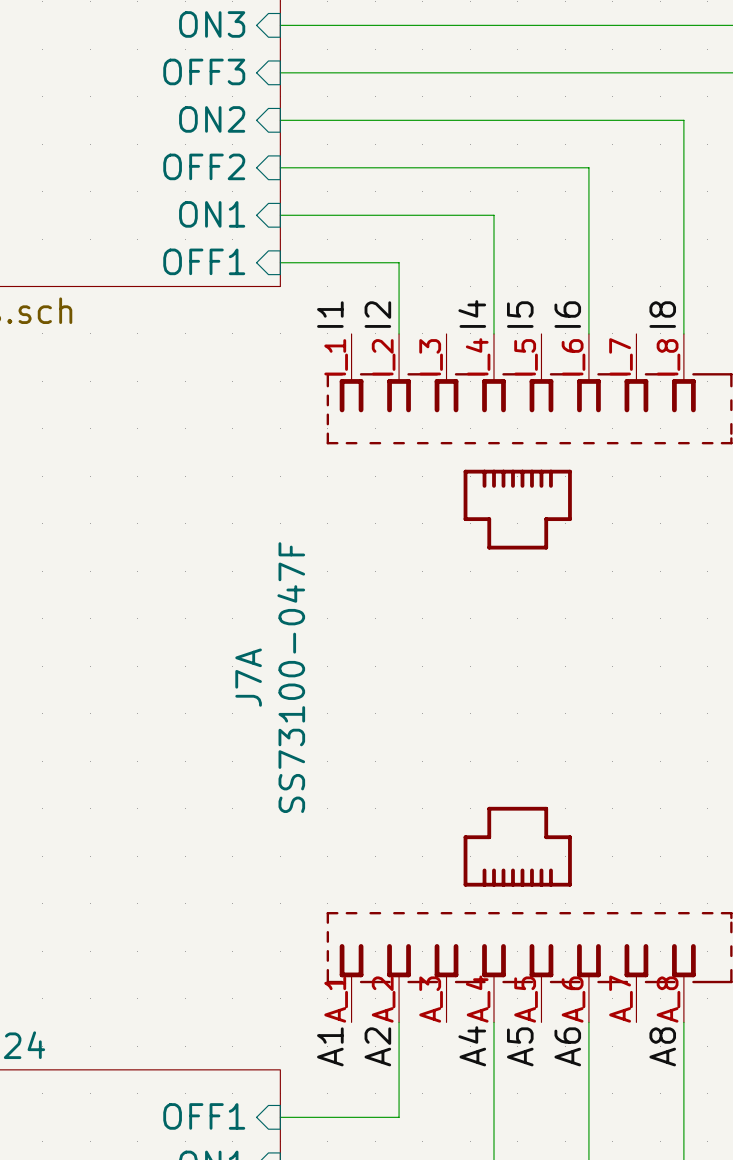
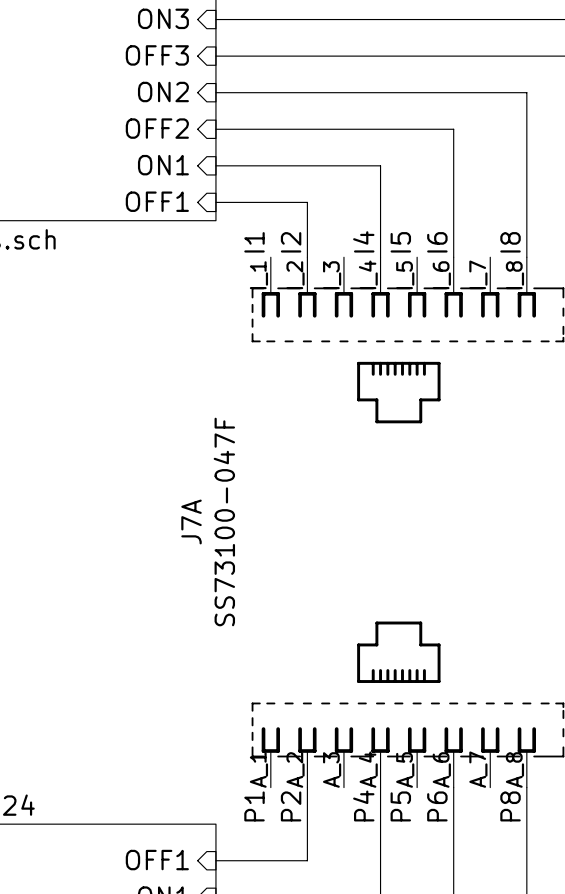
label: A1 (330, 1046) -> P1 (254, 806)
label: A2 (377, 1046) -> P2 (291, 806)
label: A4 (472, 1046) -> P4 (363, 806)
label: A5 (520, 1046) -> P5 (400, 806)
label: A6 (567, 1046) -> P6 (437, 806)
label: A8 (662, 1046) -> P8 (510, 806)

